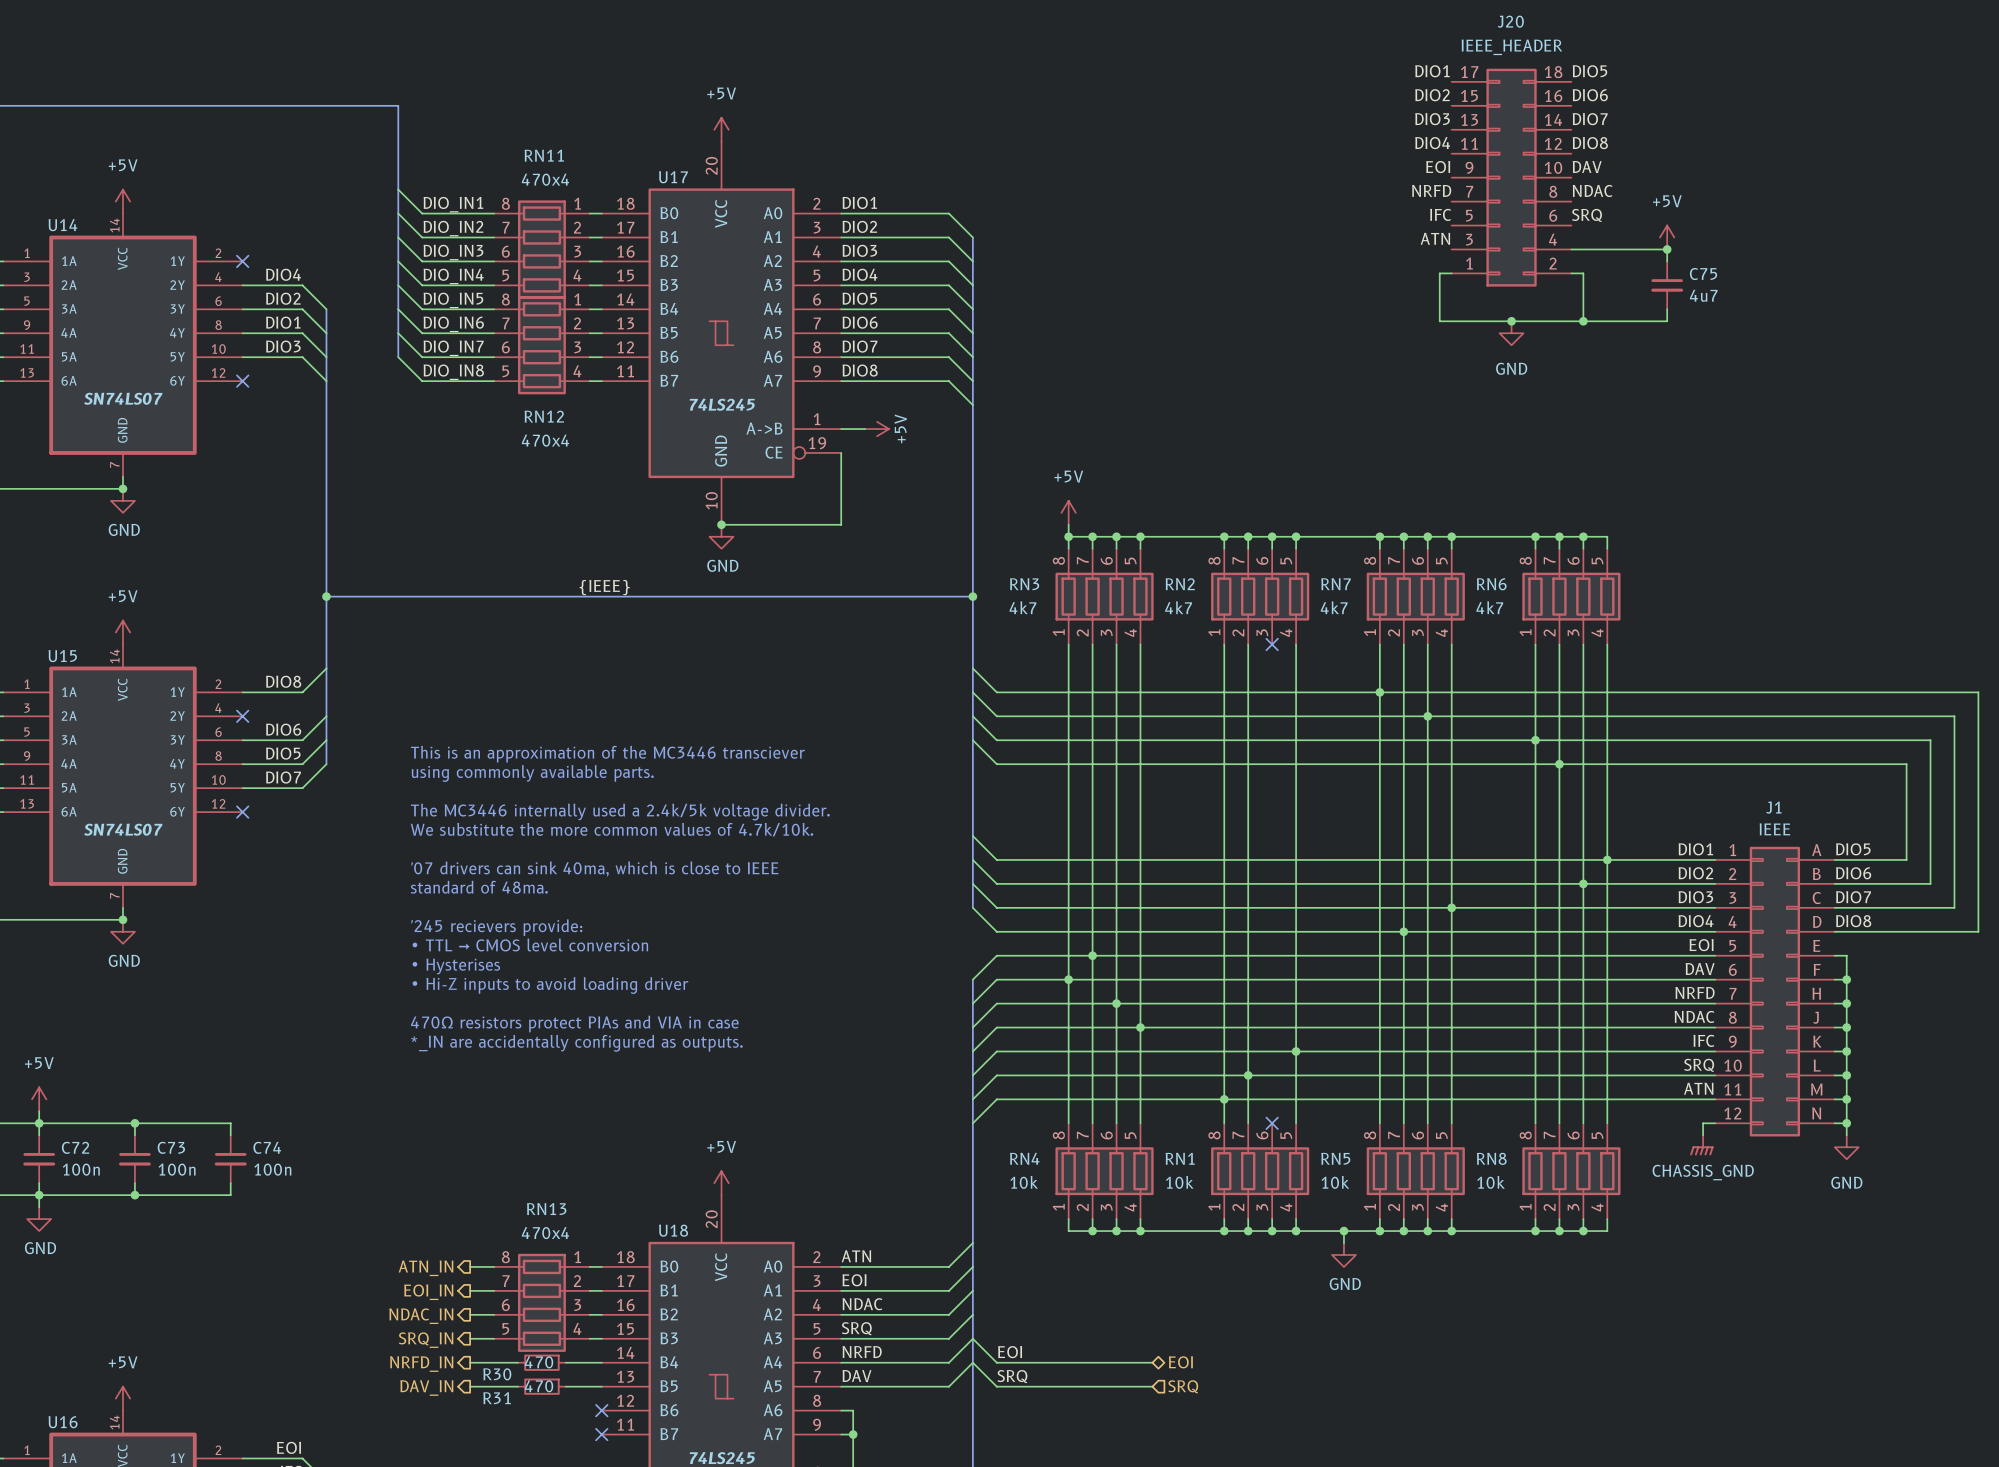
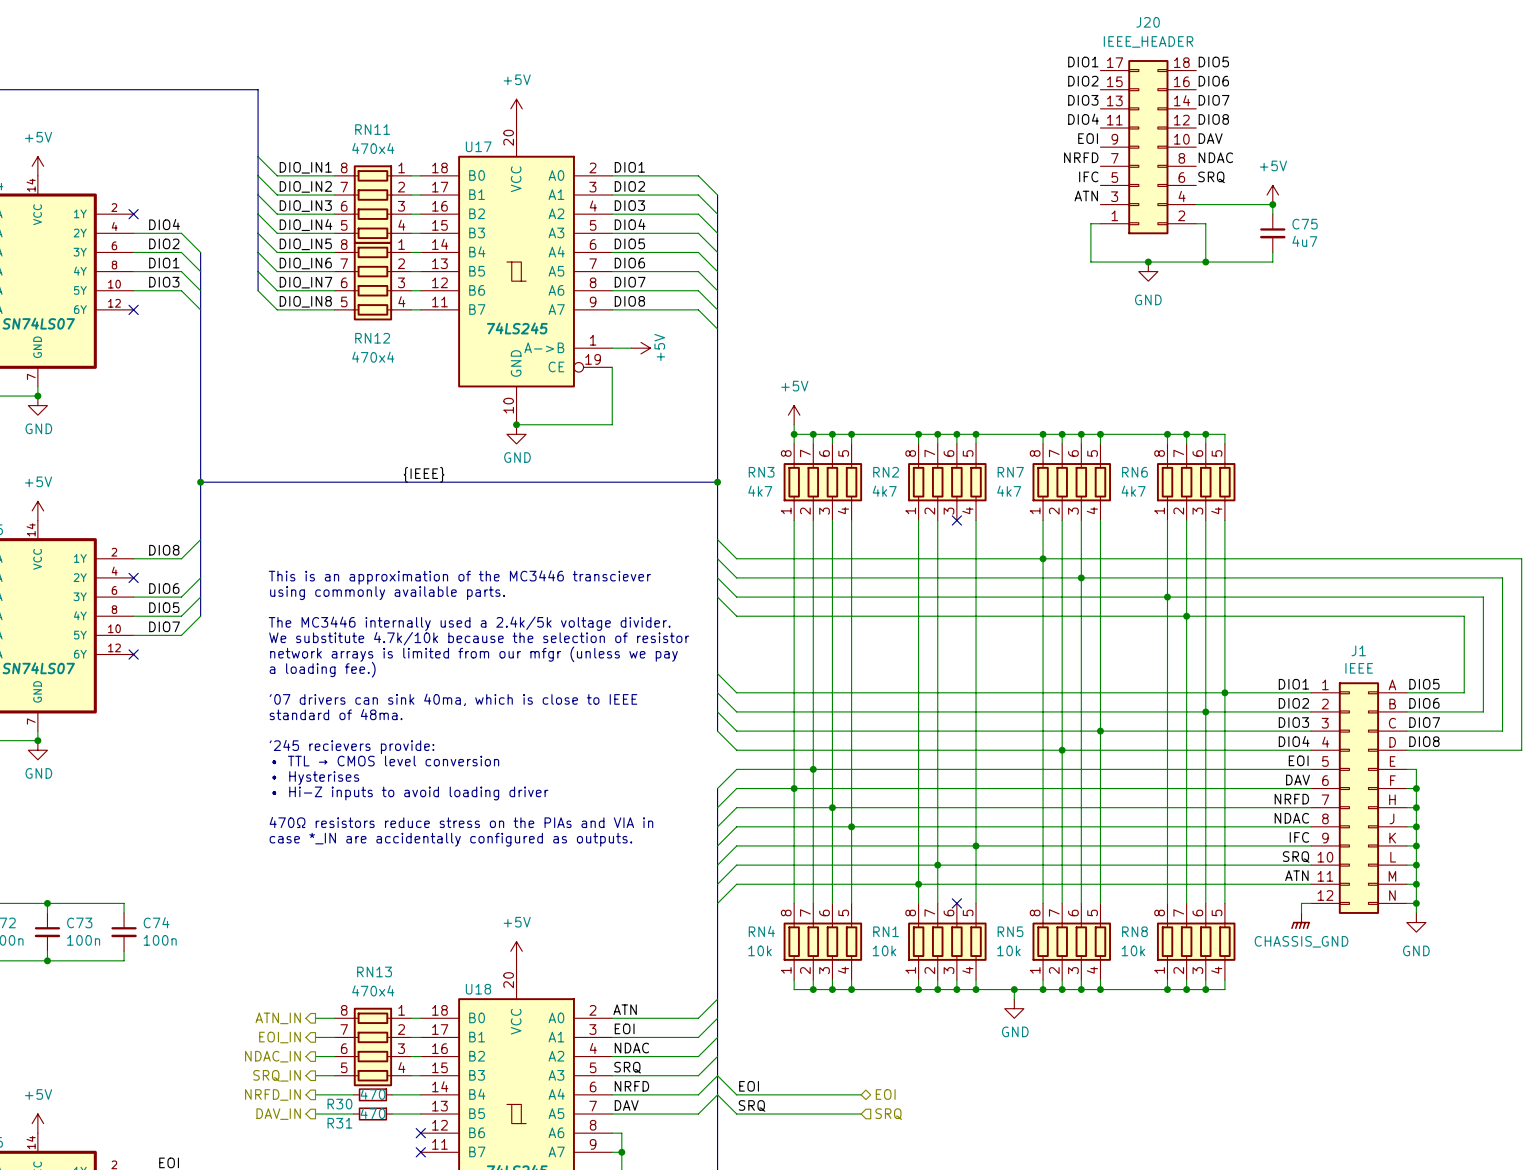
text: none -> using commonly available parts. (387, 593)
text position: This is an approximation of the MC3446 transciever (607, 754) -> This is an approximation of the MC3446 transciever (459, 577)
text: using commonly available parts. (532, 773) -> The MC3446 internally used a 2.4k/5k voltage divider. (469, 623)
text: none -> We substitute 4.7k/10k because the selection of resistor (479, 638)
text: The MC3446 internally used a 2.4k/5k voltage divider. (620, 812) -> network arrays is limited from our mfgr (unless we pay (473, 654)
text: We substitute the more common values of 4.7k/10k. (612, 829) -> a loading fee.) (322, 669)
text: 470Ω resistors protect PIAs and VIA in case (574, 1023) -> 470Ω resistors reduce stress on the PIAs and VIA in (461, 822)
text: *_IN are accidentally configured as outputs. (577, 1043) -> case *_IN are accidentally configured as outputs. (450, 839)

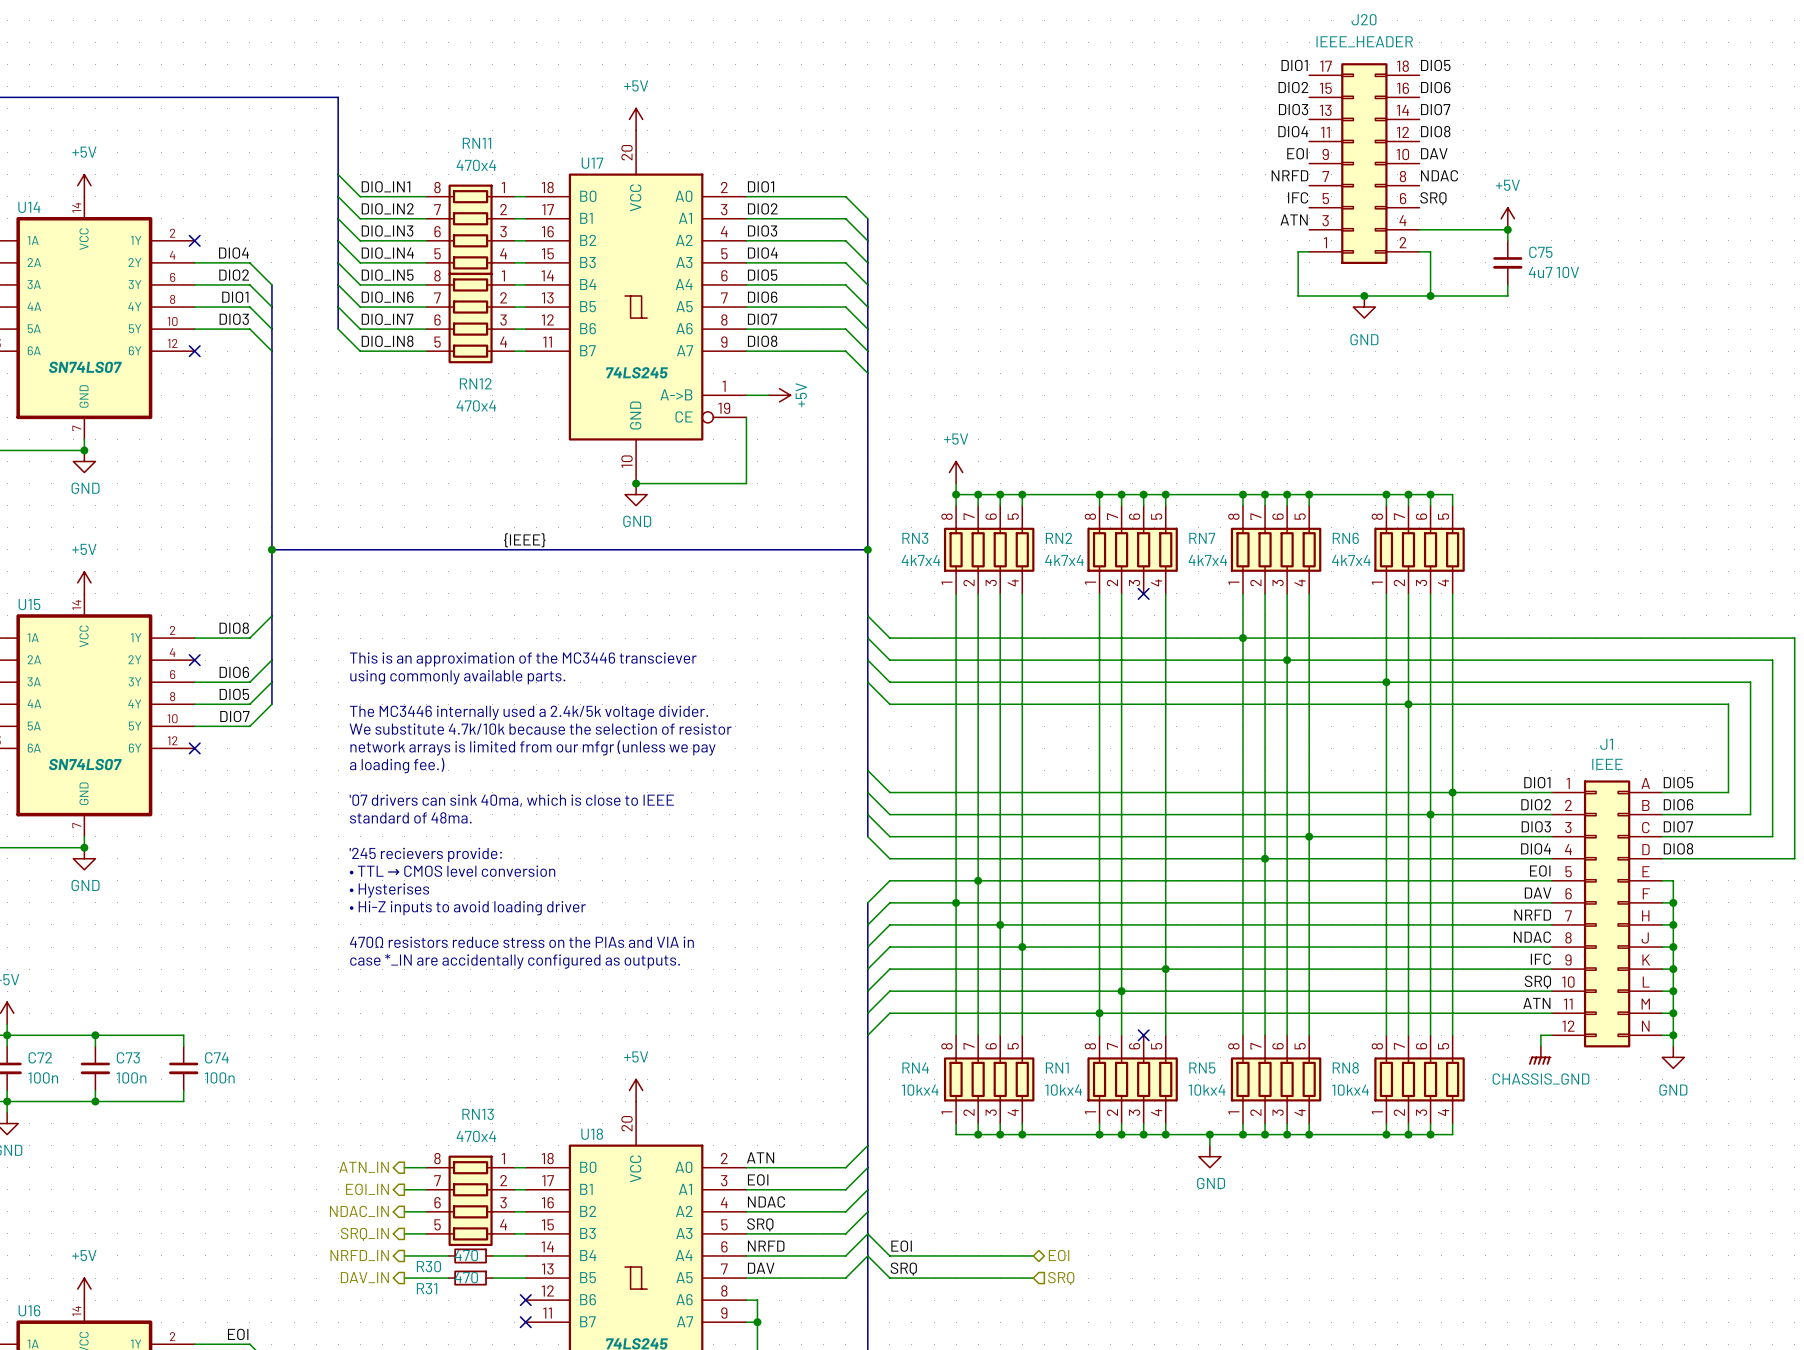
C75 value: 4u7 (1304, 241) -> 4u7 10V (1553, 272)
RN3 value: 4k7 (760, 491) -> 4k7x4 (920, 560)
RN2 value: 4k7 (884, 491) -> 4k7x4 (1064, 560)
RN7 value: 4k7 (1009, 491) -> 4k7x4 (1207, 560)
RN6 value: 4k7 (1133, 491) -> 4k7x4 (1351, 560)
RN4 value: 10k (760, 950) -> 10kx4 (920, 1090)
RN1 value: 10k (884, 950) -> 10kx4 (1063, 1090)
RN5 value: 10k (1008, 950) -> 10kx4 (1207, 1090)
RN8 value: 10k (1133, 950) -> 10kx4 (1350, 1090)

